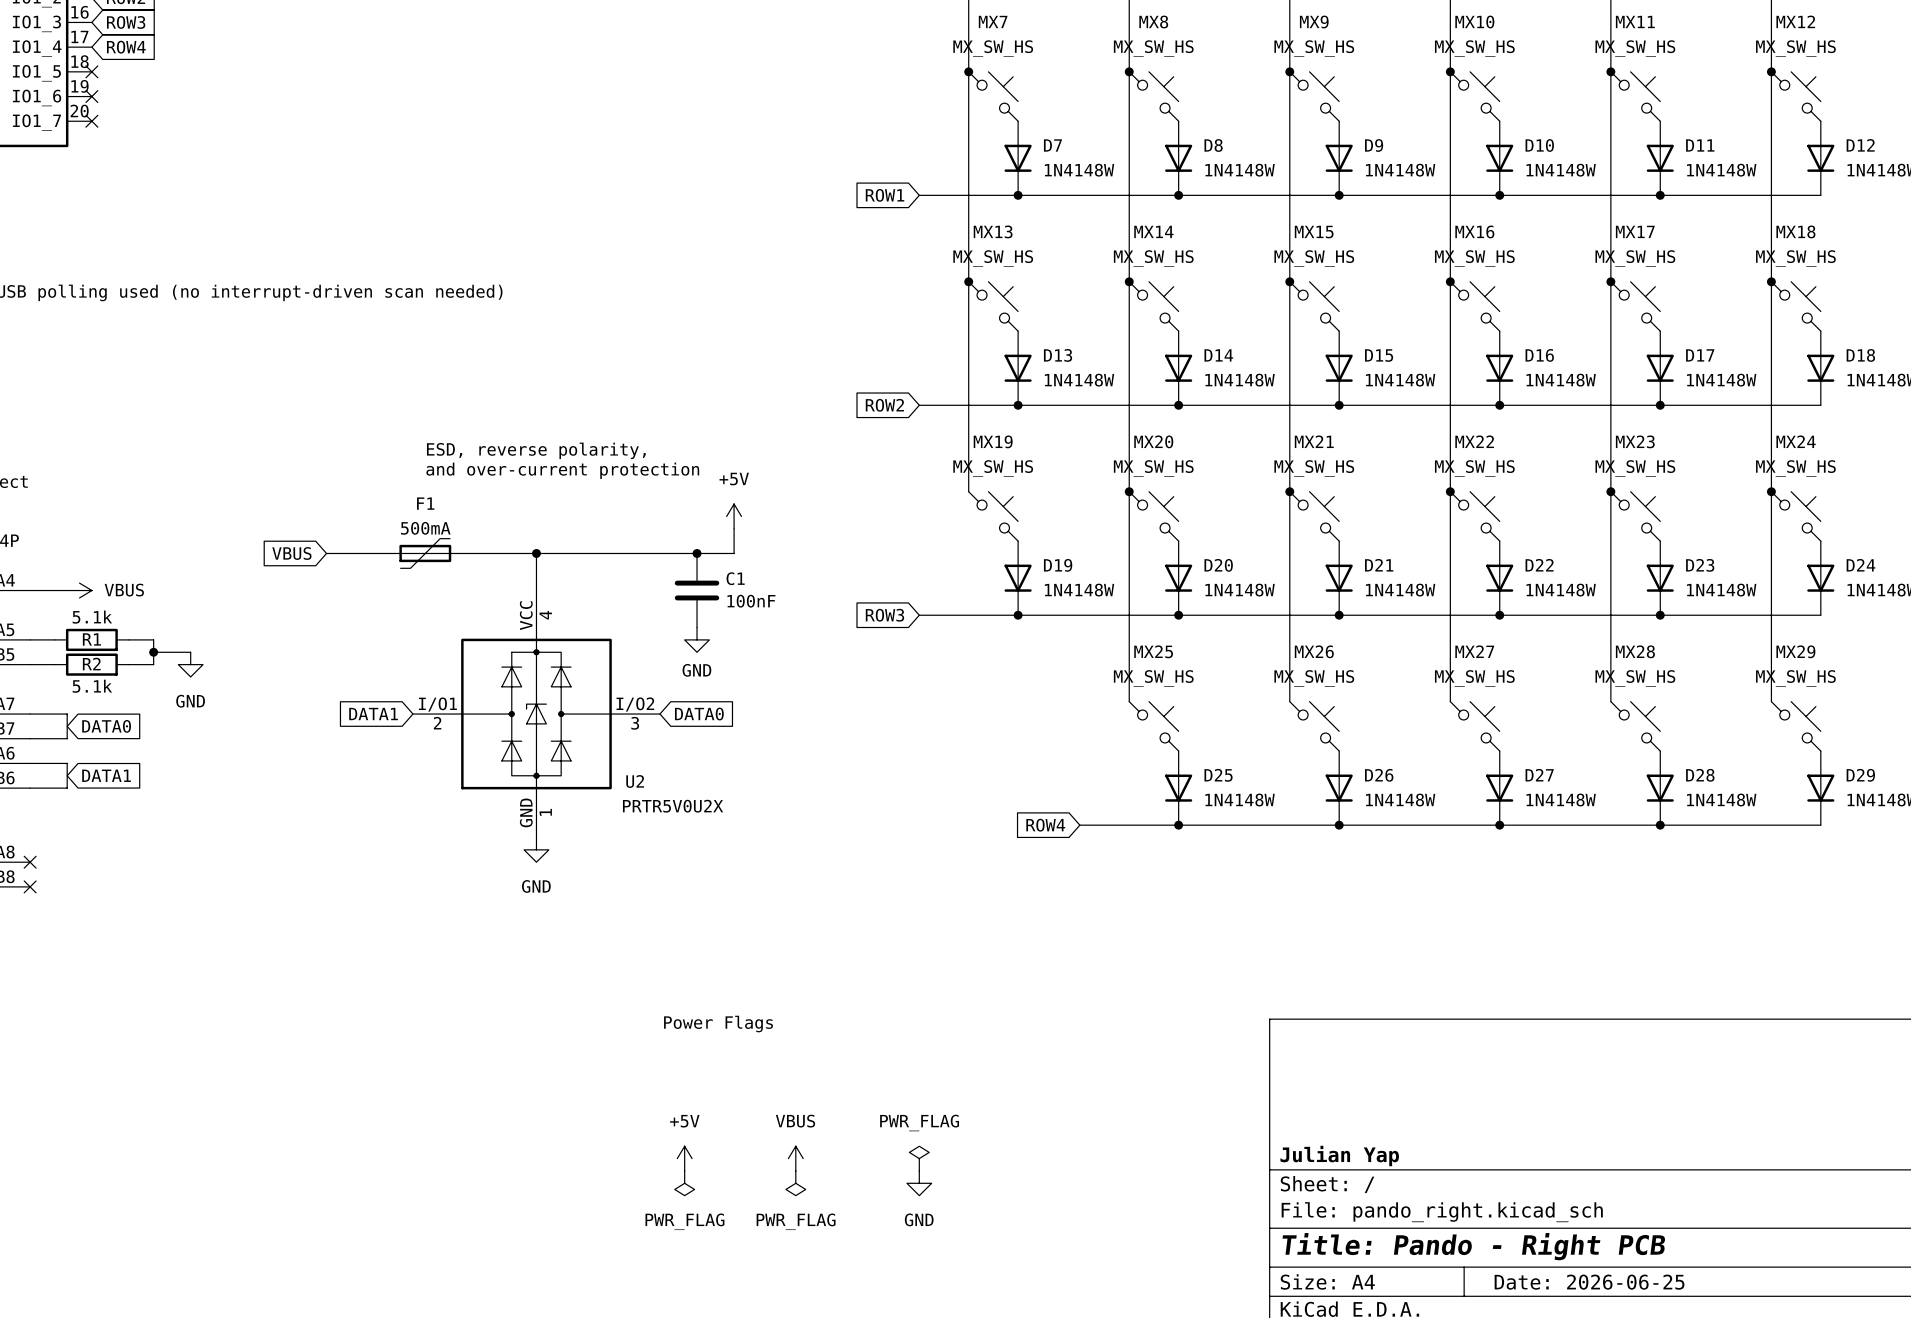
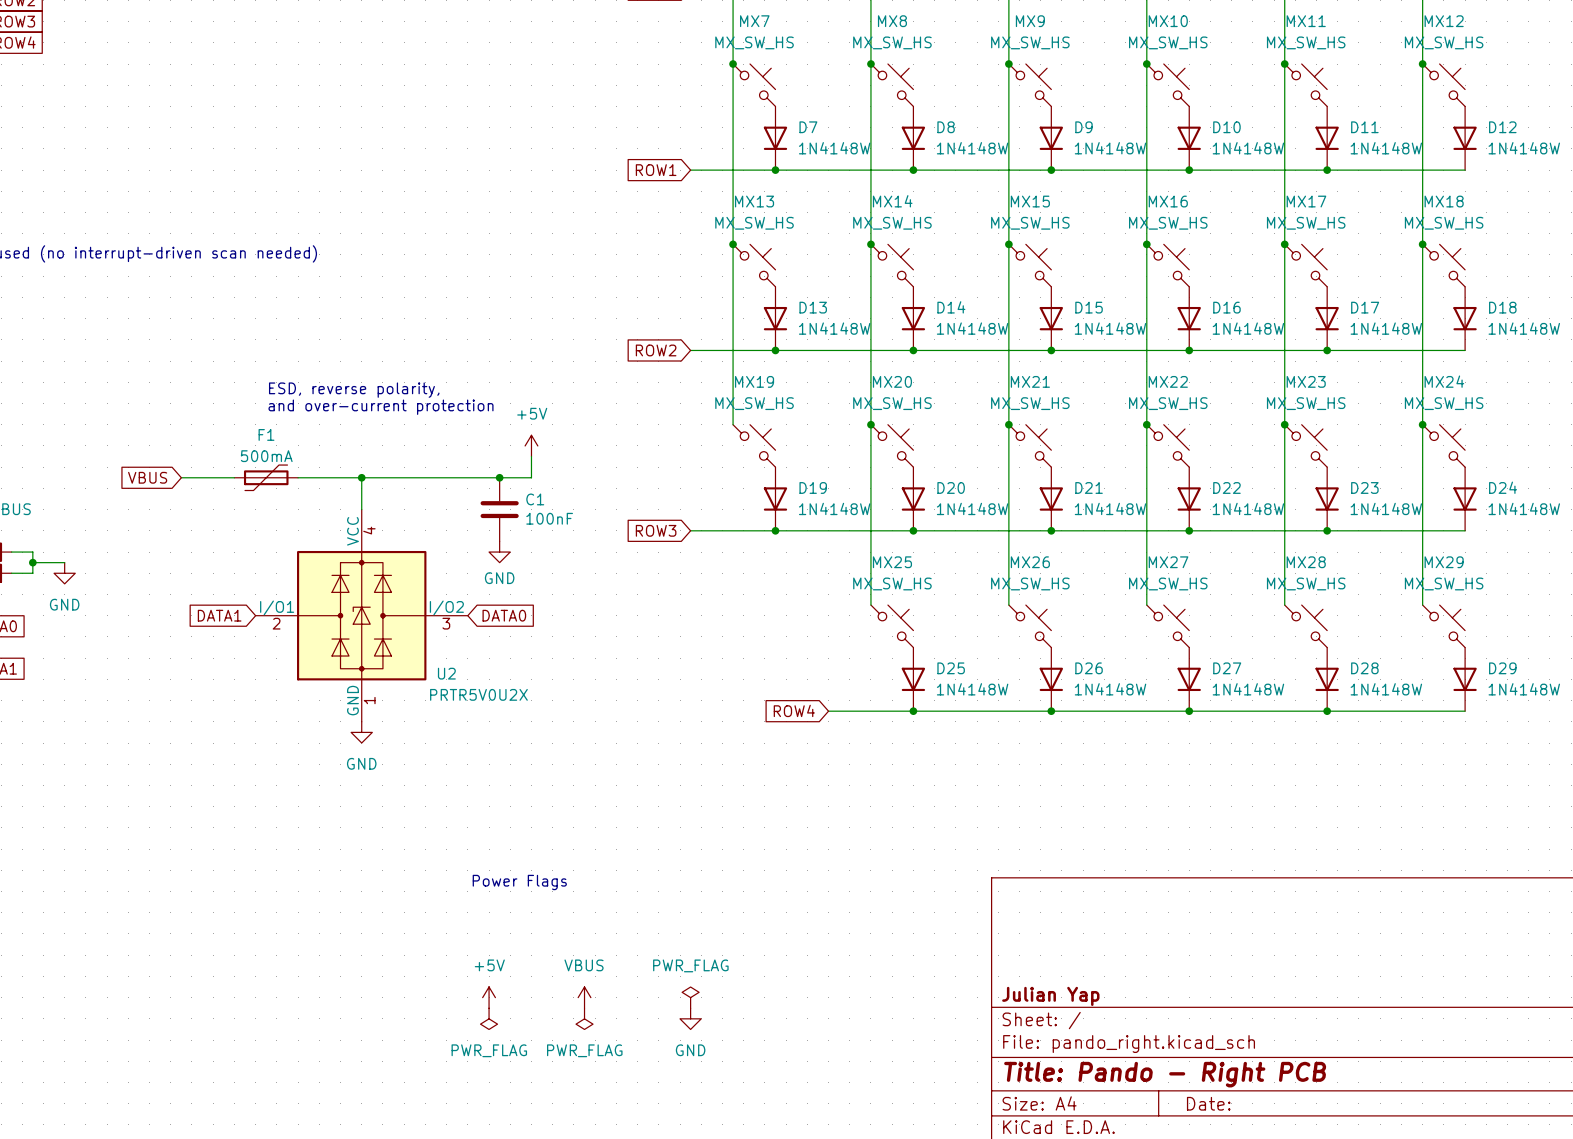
title block: Date: 2026-06-25 (1589, 1282) -> Date: (1208, 1103)

